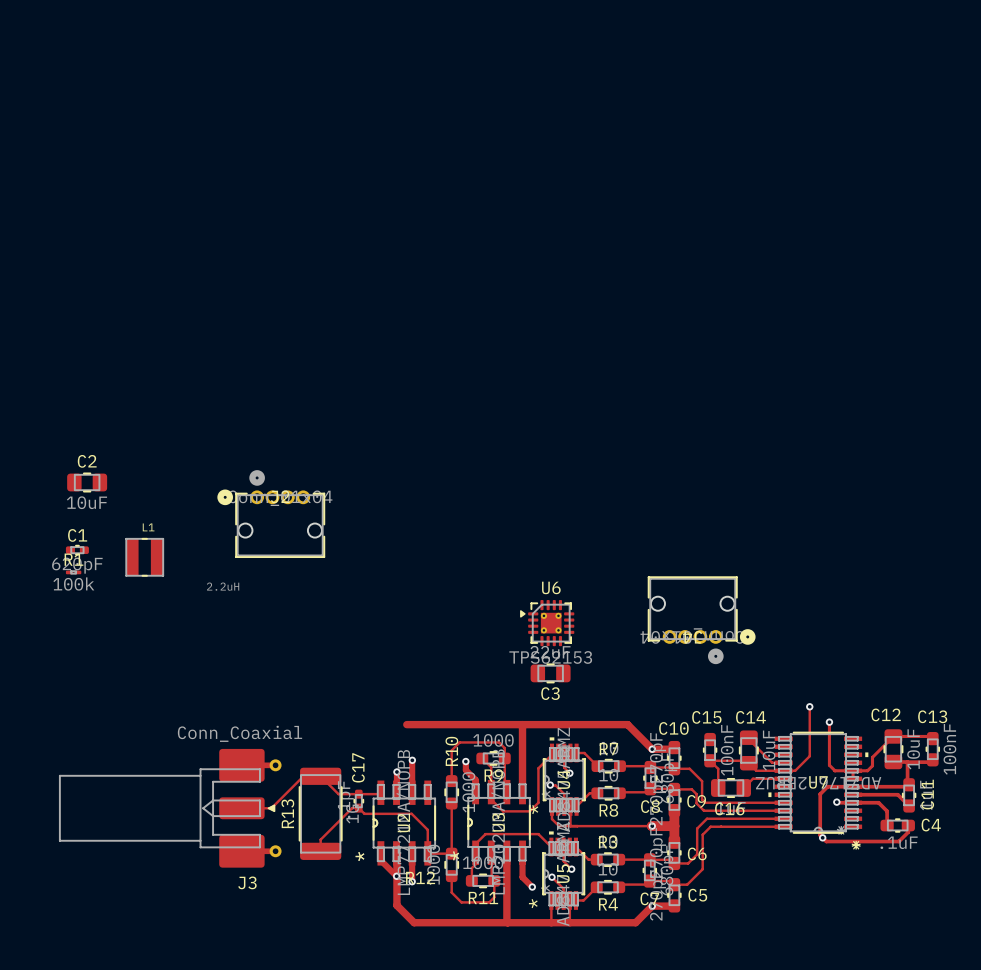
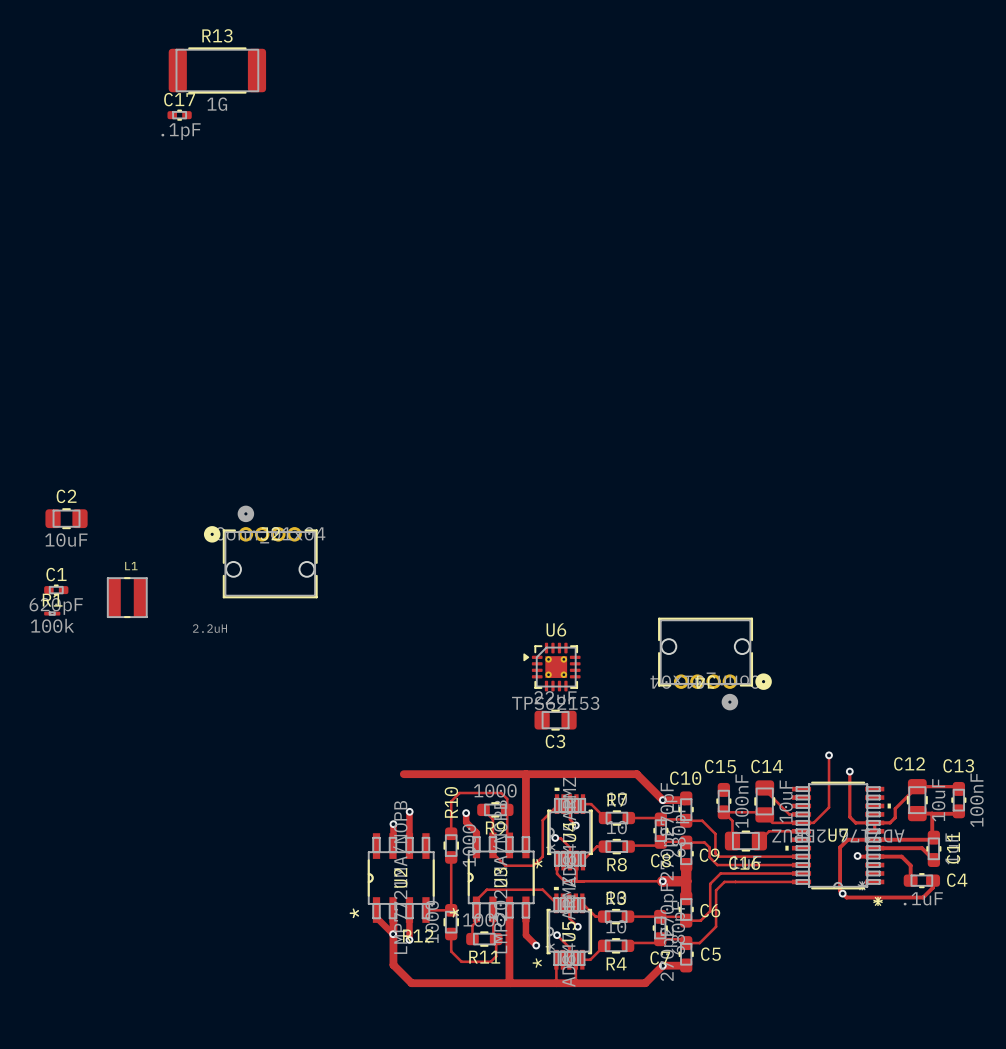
track: (380, 792) (338, 794) (320, 776) (303, 776) (271, 808) (241, 808) -> none
C17 rotation: 0° (358, 801) -> 90° clockwise (179, 115)
C17 position: (358, 801) -> (179, 115)
J3: Conn_Coaxial (170, 808) -> none
R13 rotation: 0° (320, 813) -> 90° clockwise (217, 70)
R13 position: (320, 813) -> (217, 70)
track: (320, 851) (320, 839) (352, 808) (358, 808) (364, 813) (411, 813) (427, 829) (427, 853) -> none

